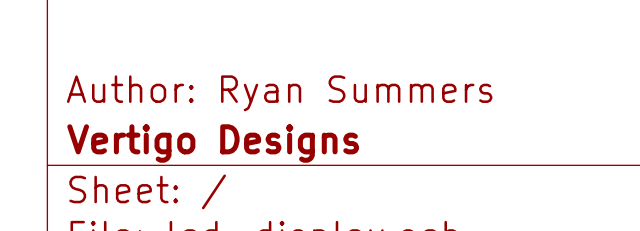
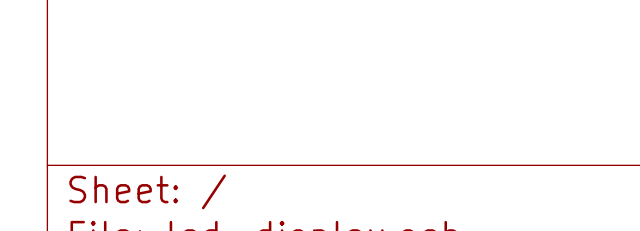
title block: Author: Ryan Summers (279, 93) -> none
title block: Vertigo Designs (213, 143) -> none

